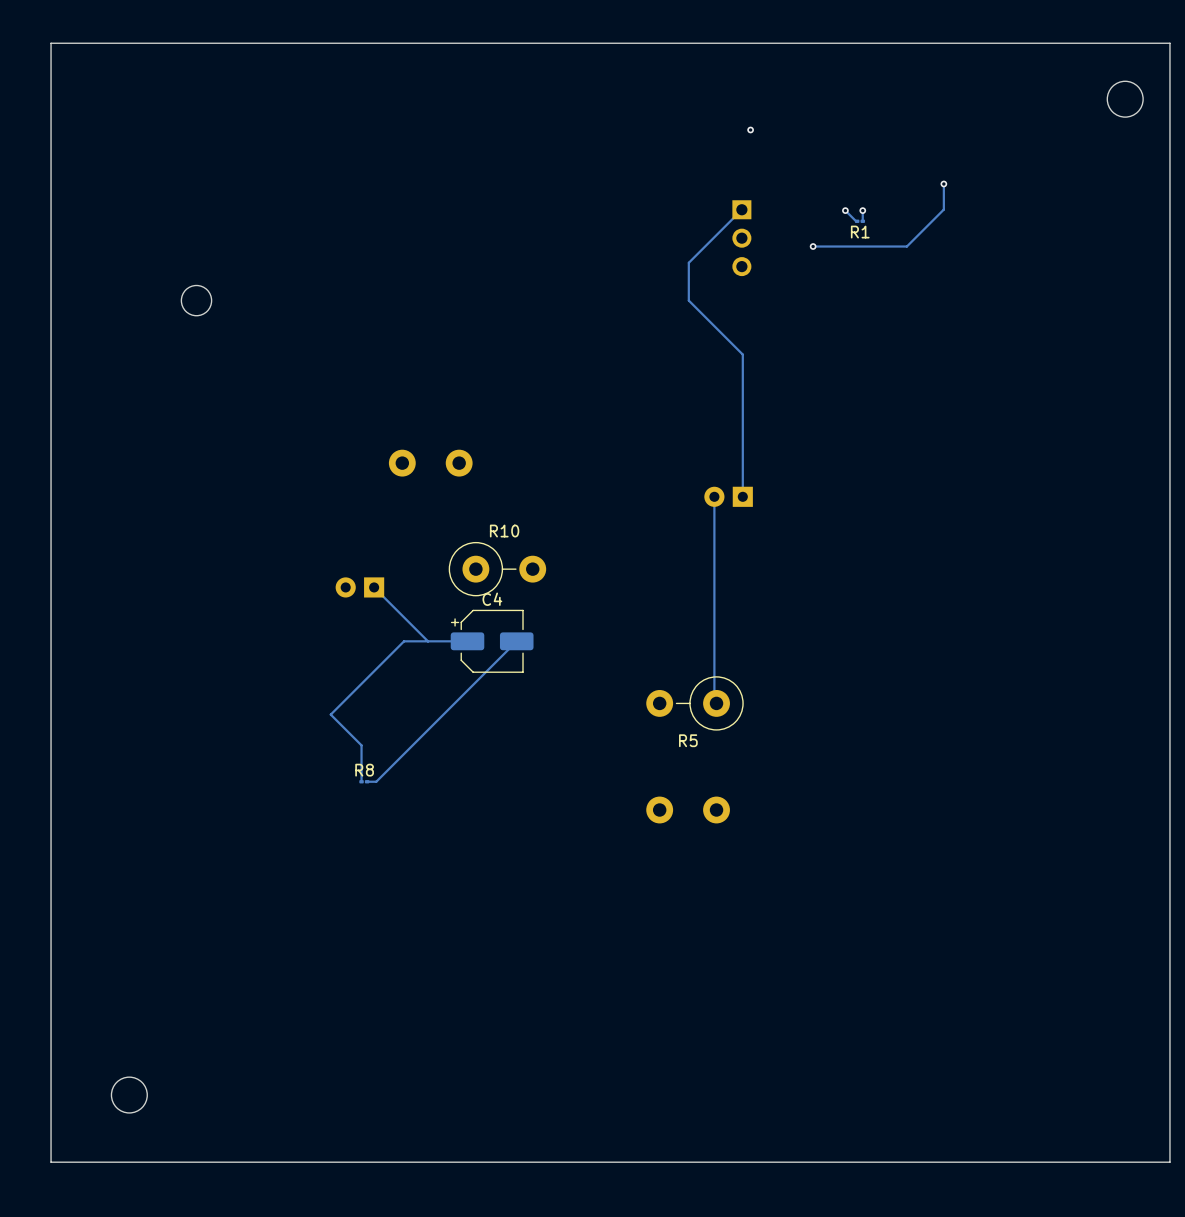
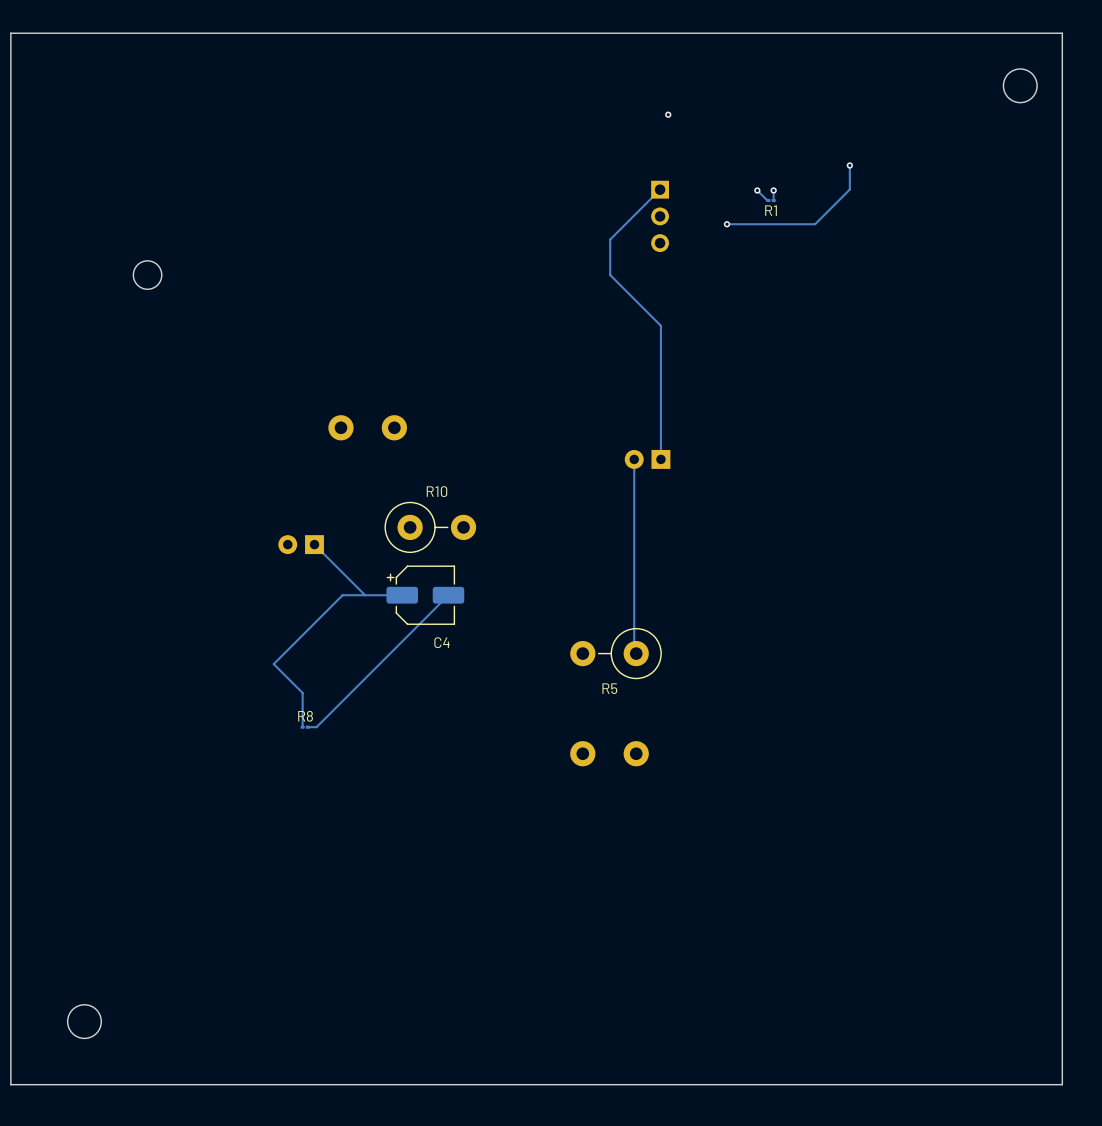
C4 name position: C4 (492, 599) -> C4 (442, 642)

